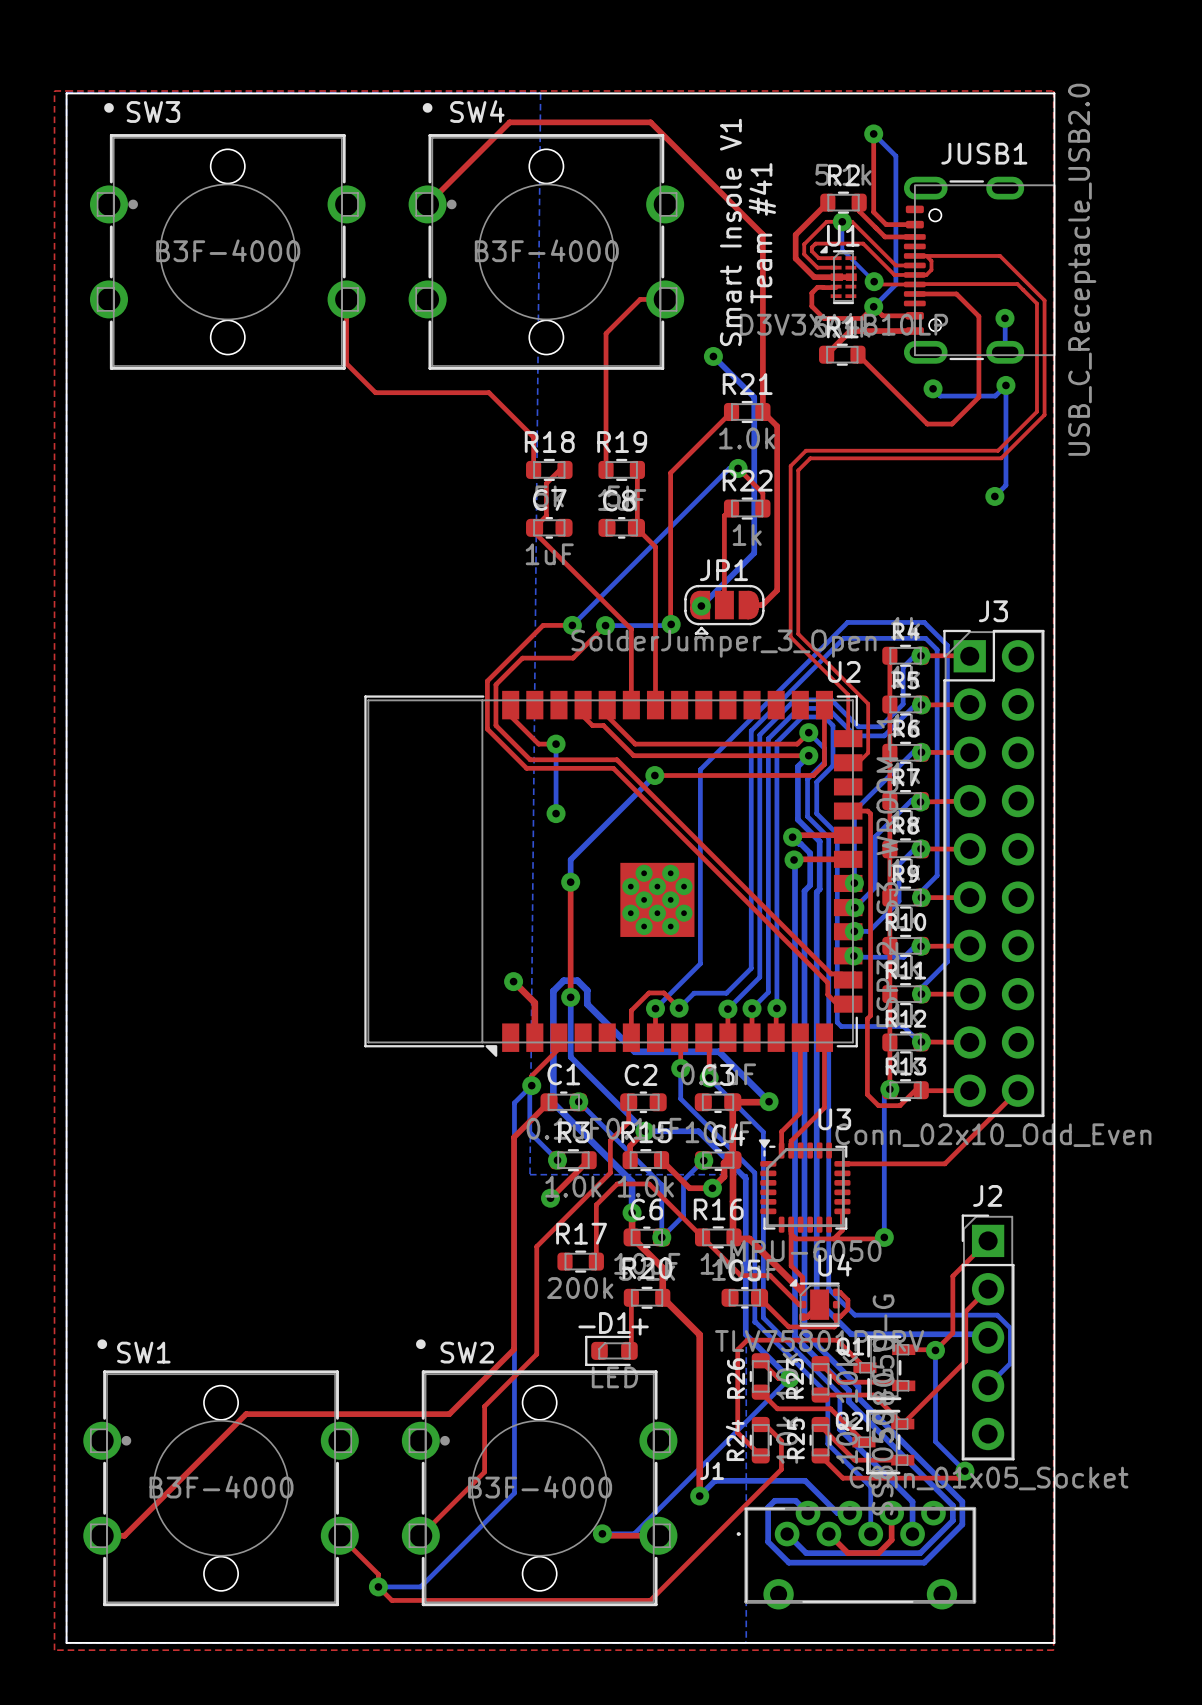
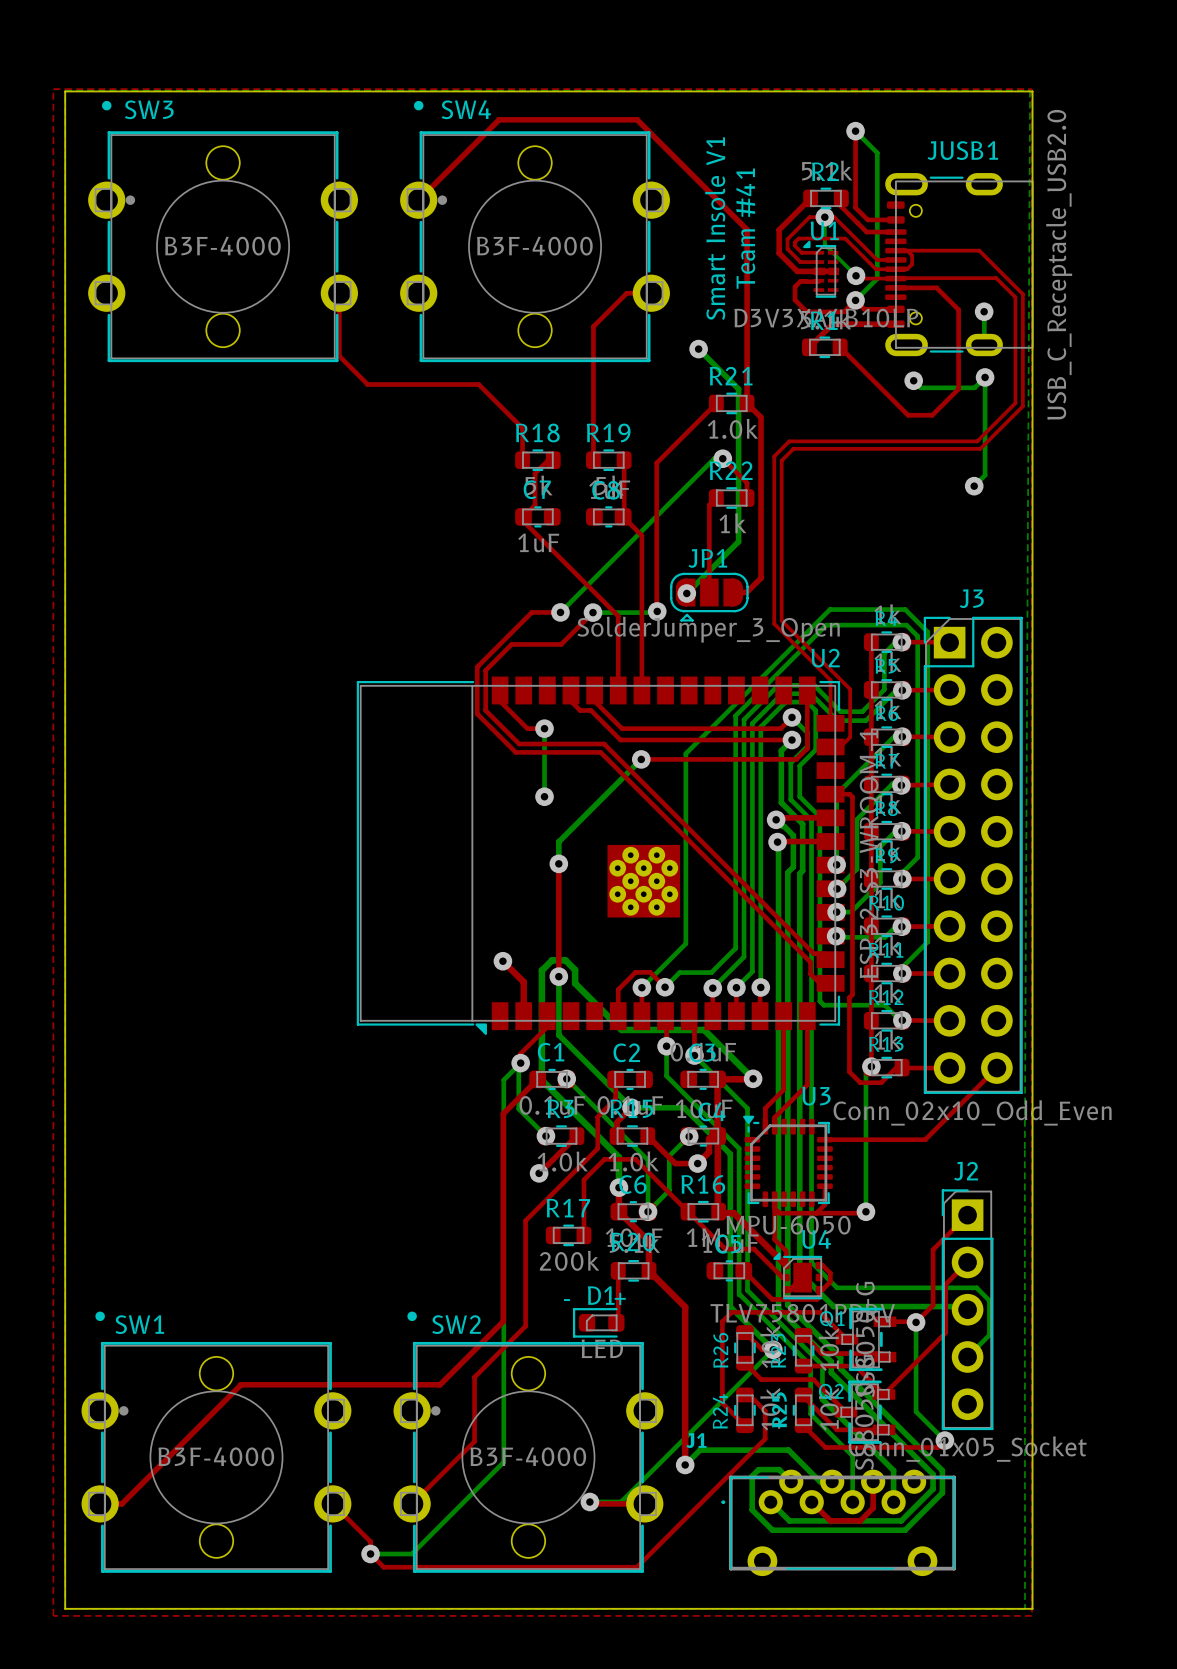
bottom zone outline: (538, 92) (540, 93) (529, 1174) (747, 1174) (745, 1642) -> (527, 90) (1030, 90) (1024, 1150) (1025, 1609) (729, 1608)

